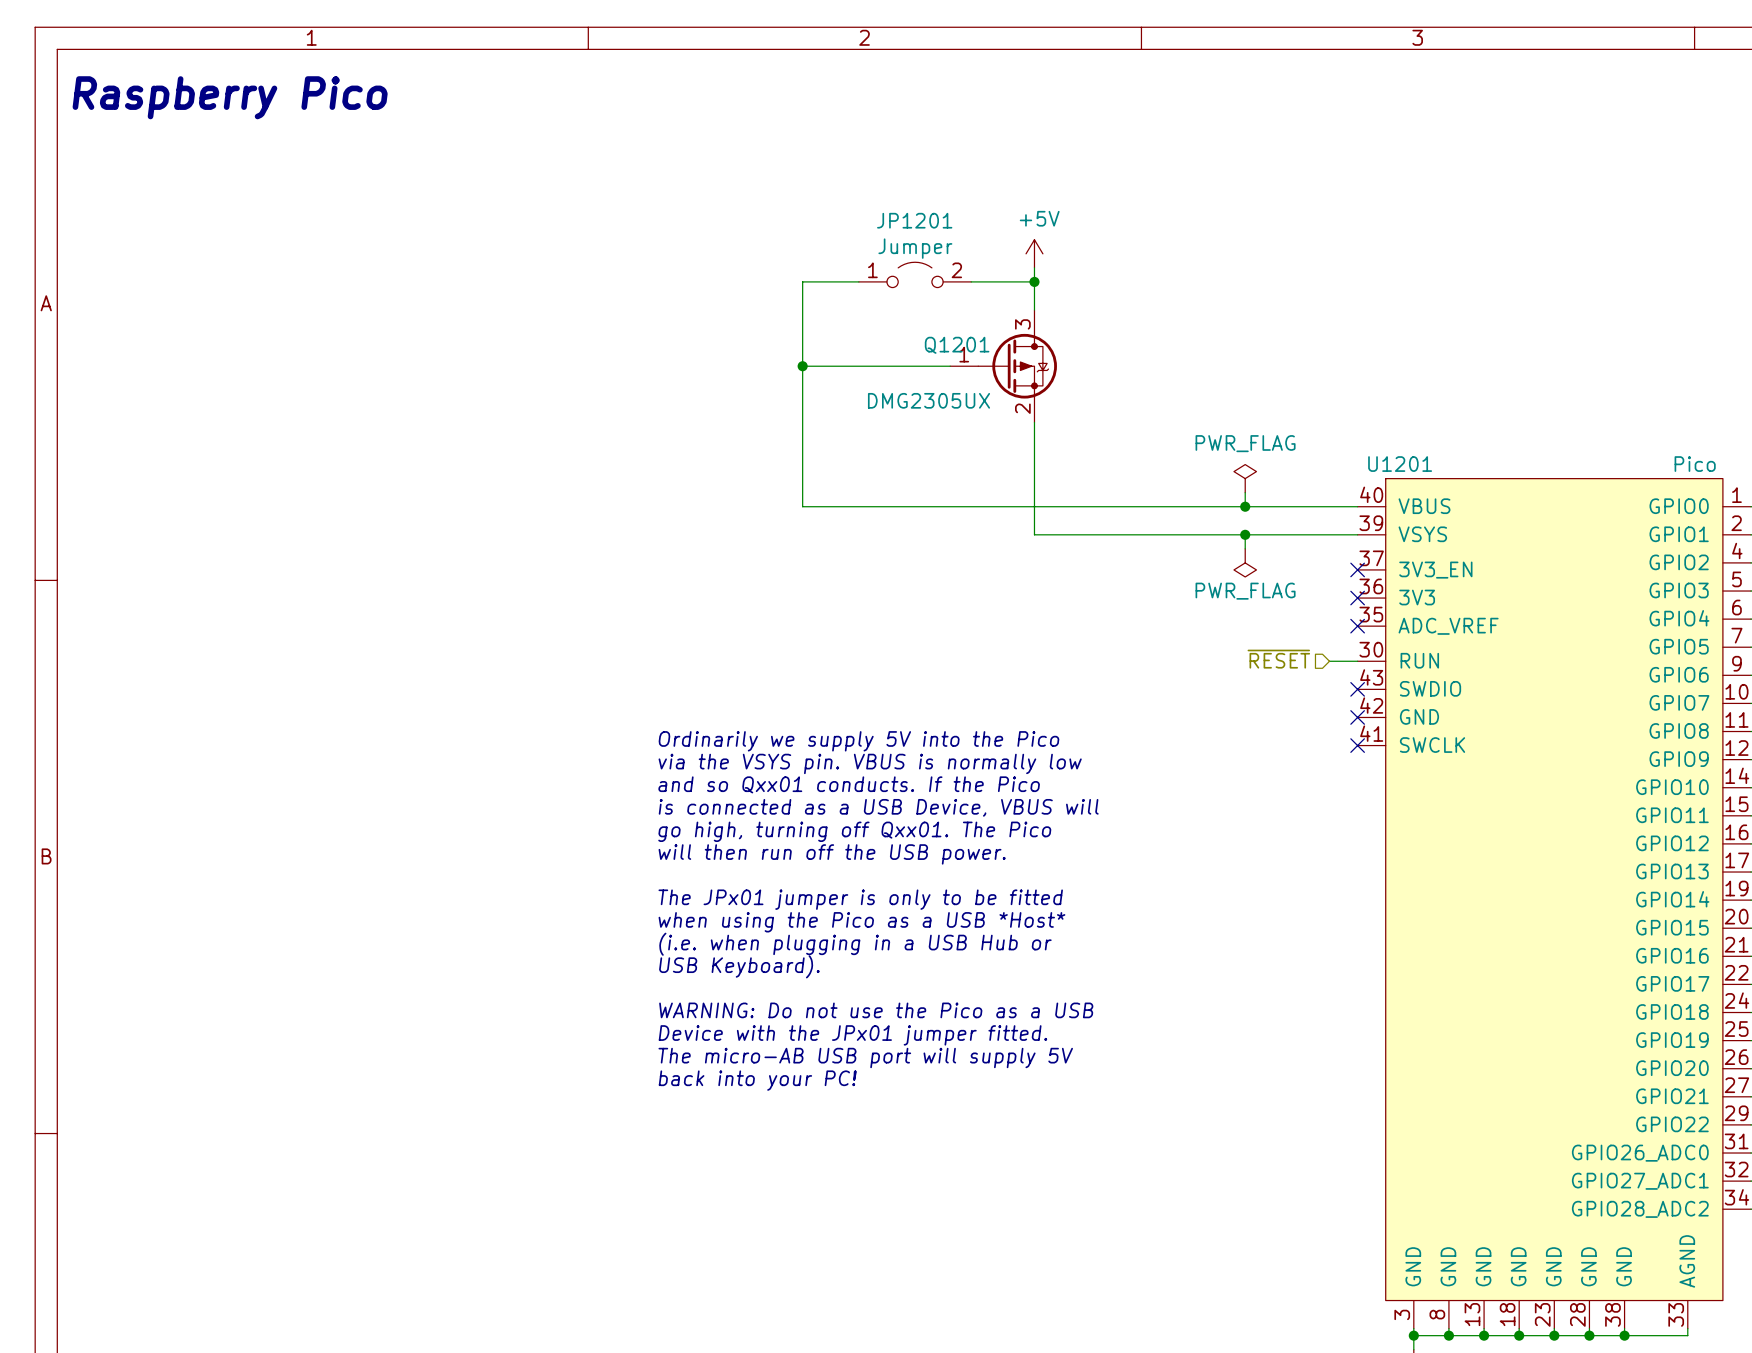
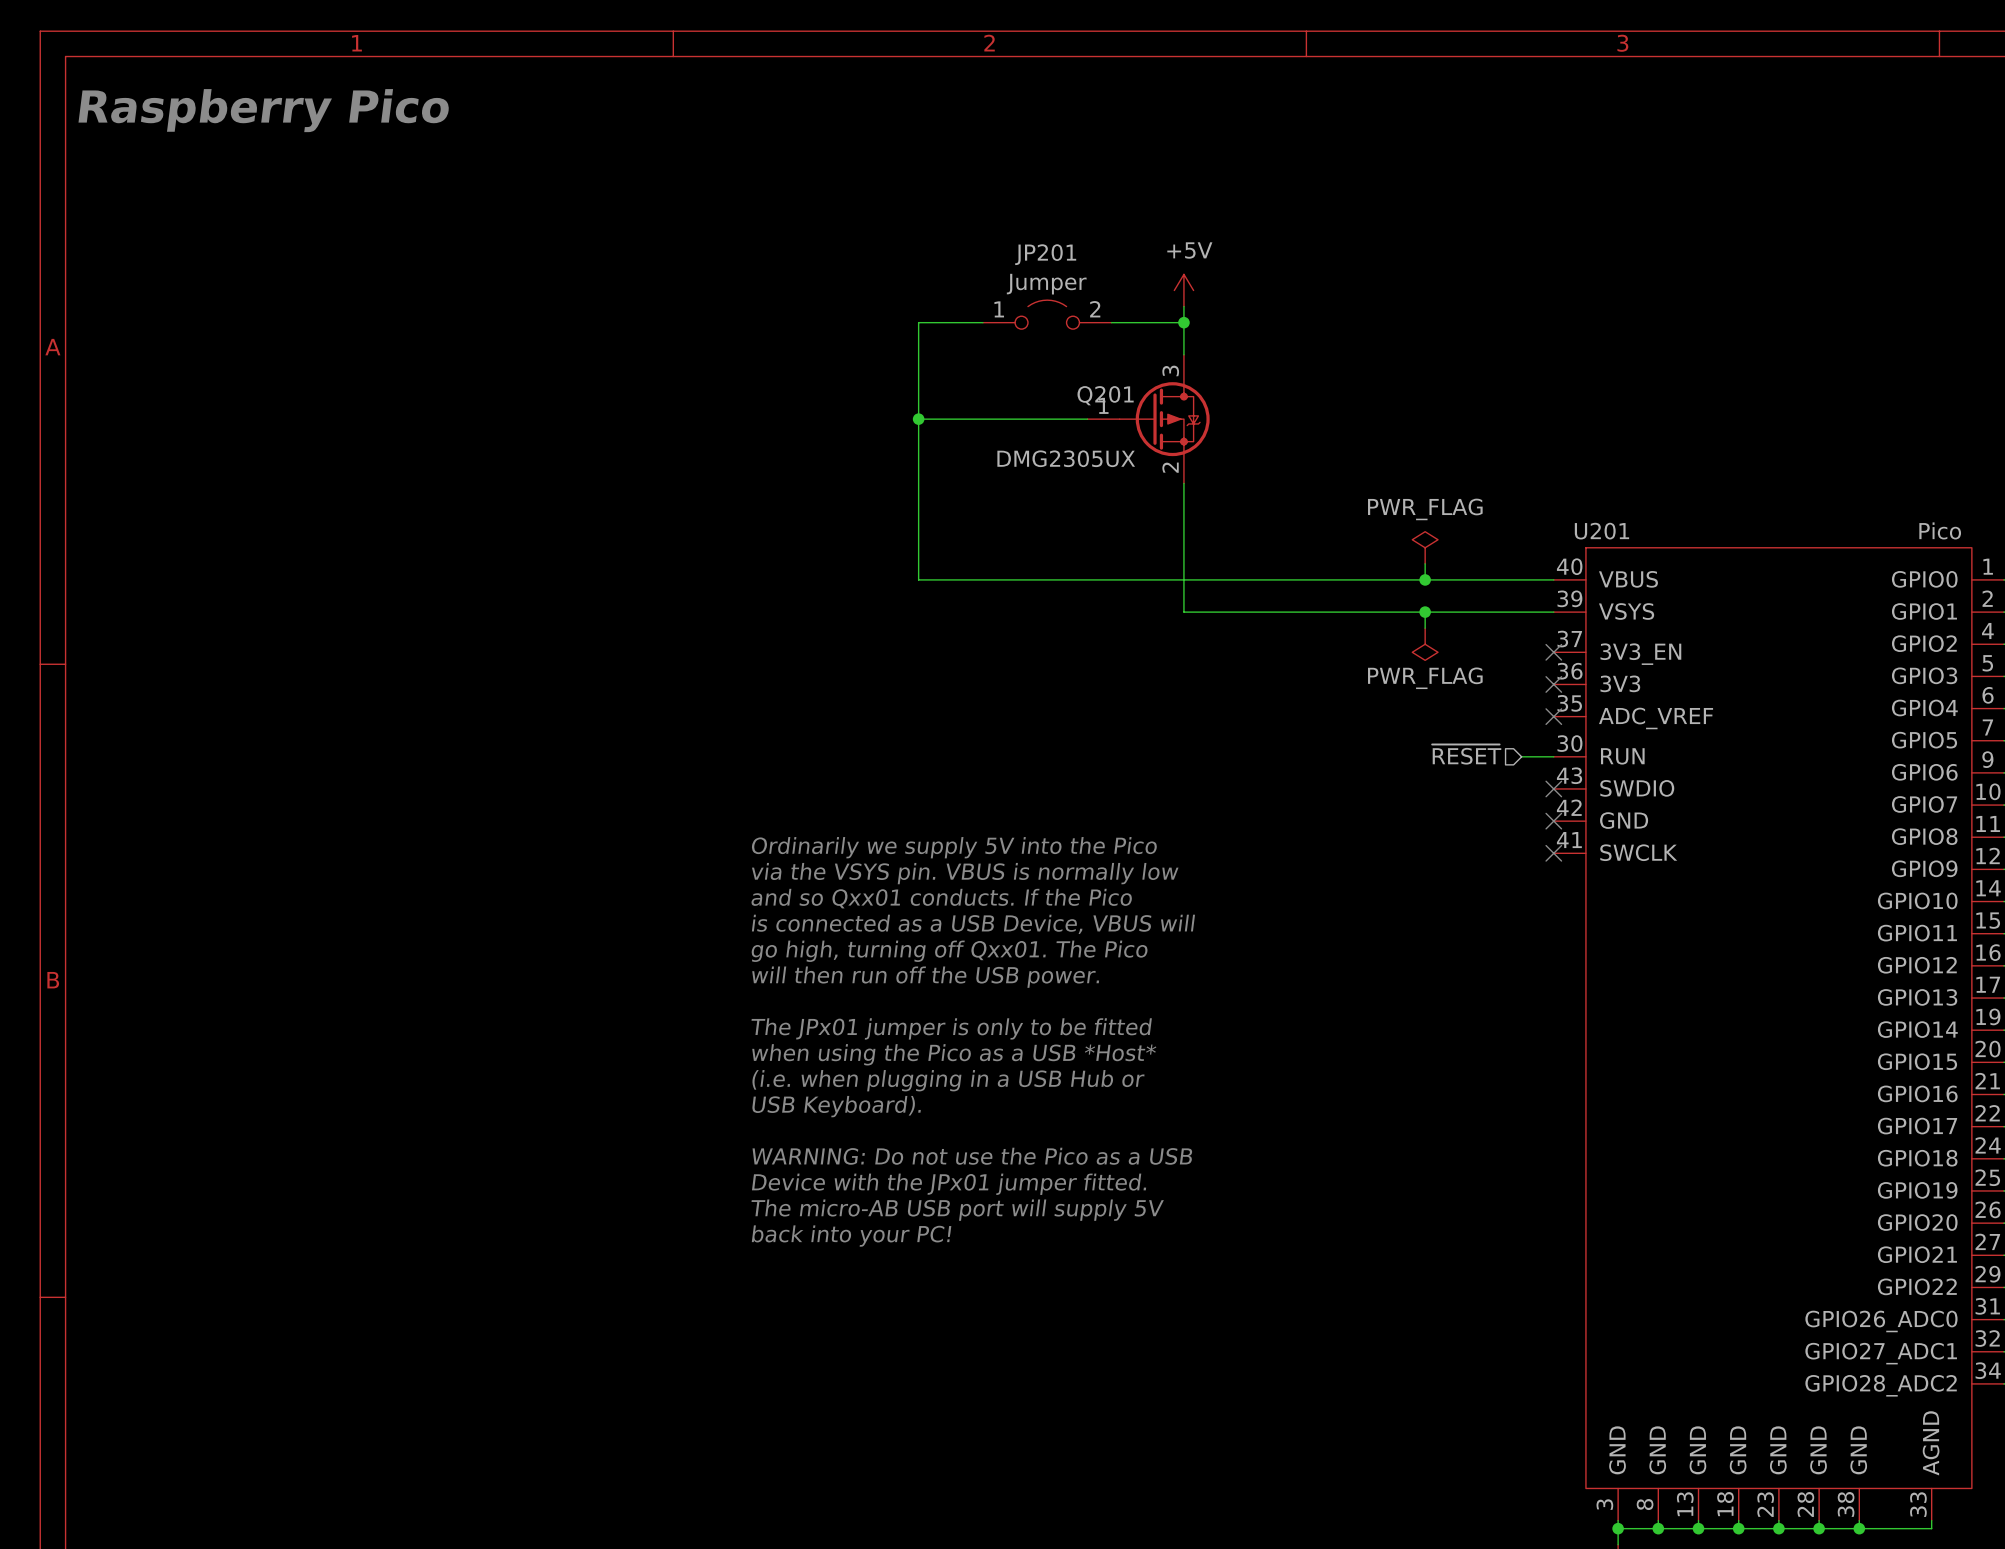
JP1201 name: JP1201 (914, 220) -> JP201 (1045, 254)
Q1201 name: Q1201 (957, 345) -> Q201 (1105, 395)
U1201 name: U1201 (1400, 464) -> U201 (1601, 531)

